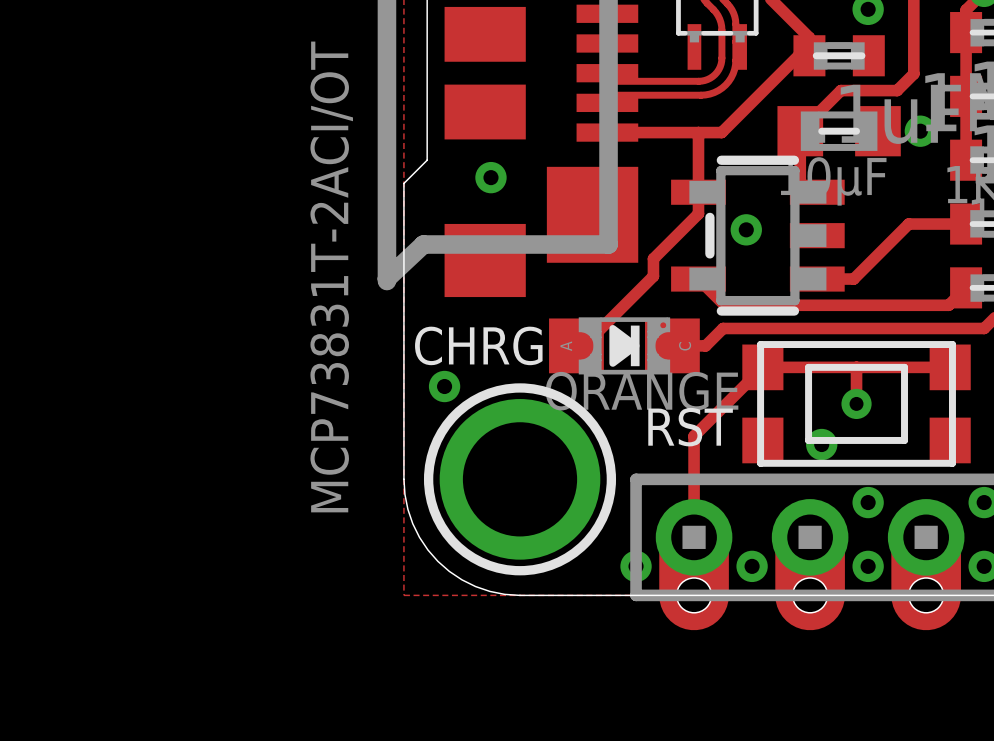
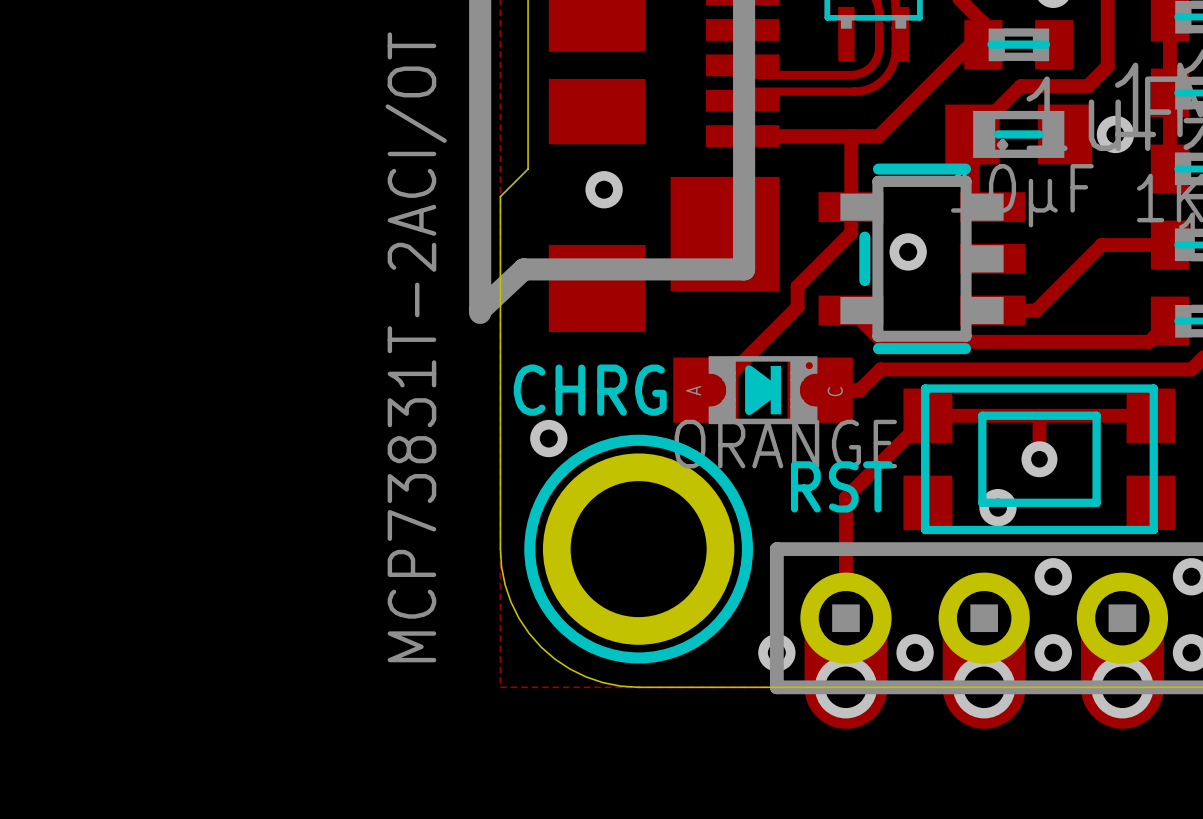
hole: (694, 595) -> none
via: none -> (845, 687)
hole: (810, 595) -> none
via: none -> (984, 687)
hole: (926, 595) -> none
via: none -> (1122, 687)

